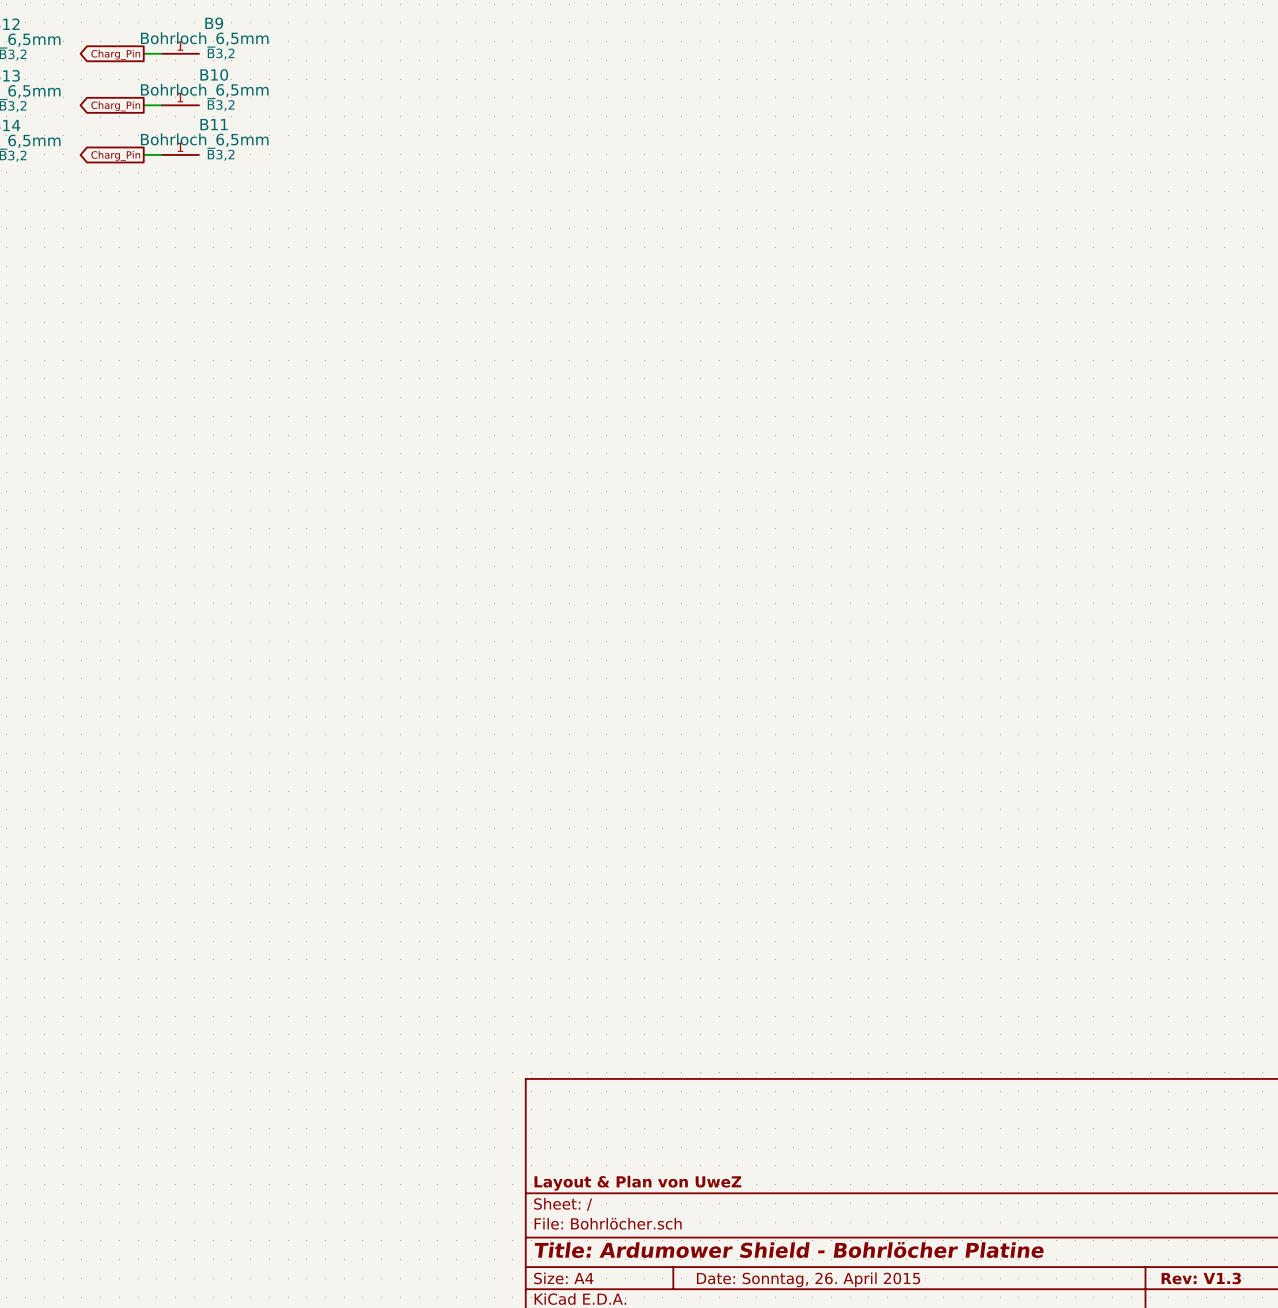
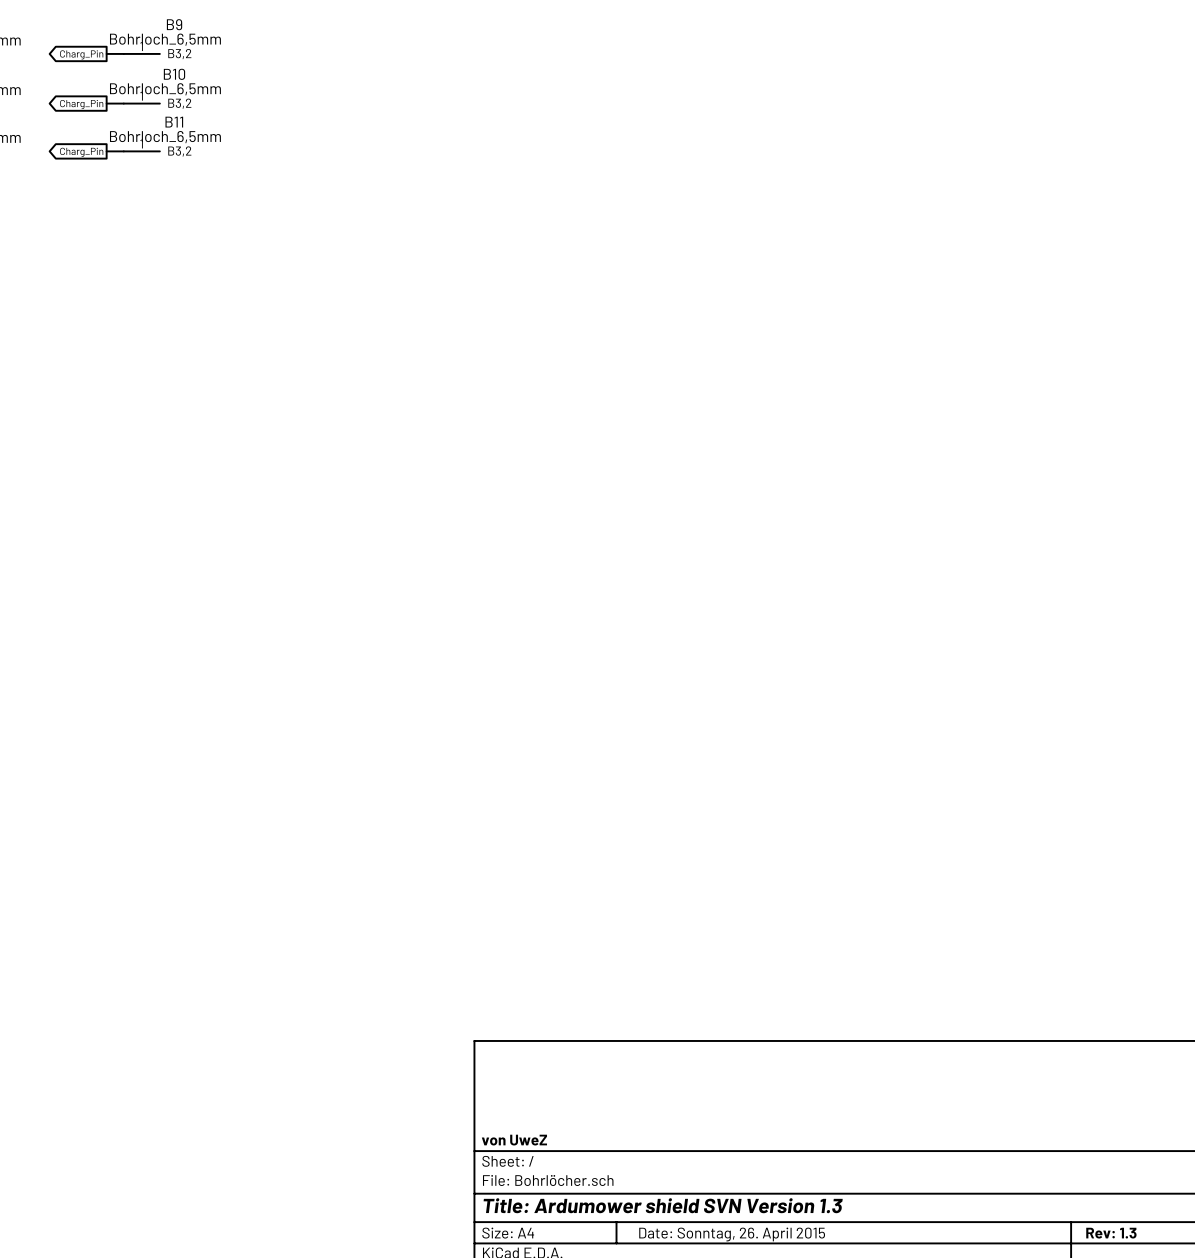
title block: Layout & Plan von UweZ (637, 1183) -> von UweZ (514, 1140)
title block: Title: Ardumower Shield - Bohrlöcher Platine (789, 1249) -> Title: Ardumower shield SVN Version 1.3 (663, 1205)
title block: Rev: V1.3 (1201, 1278) -> Rev: 1.3 (1111, 1233)

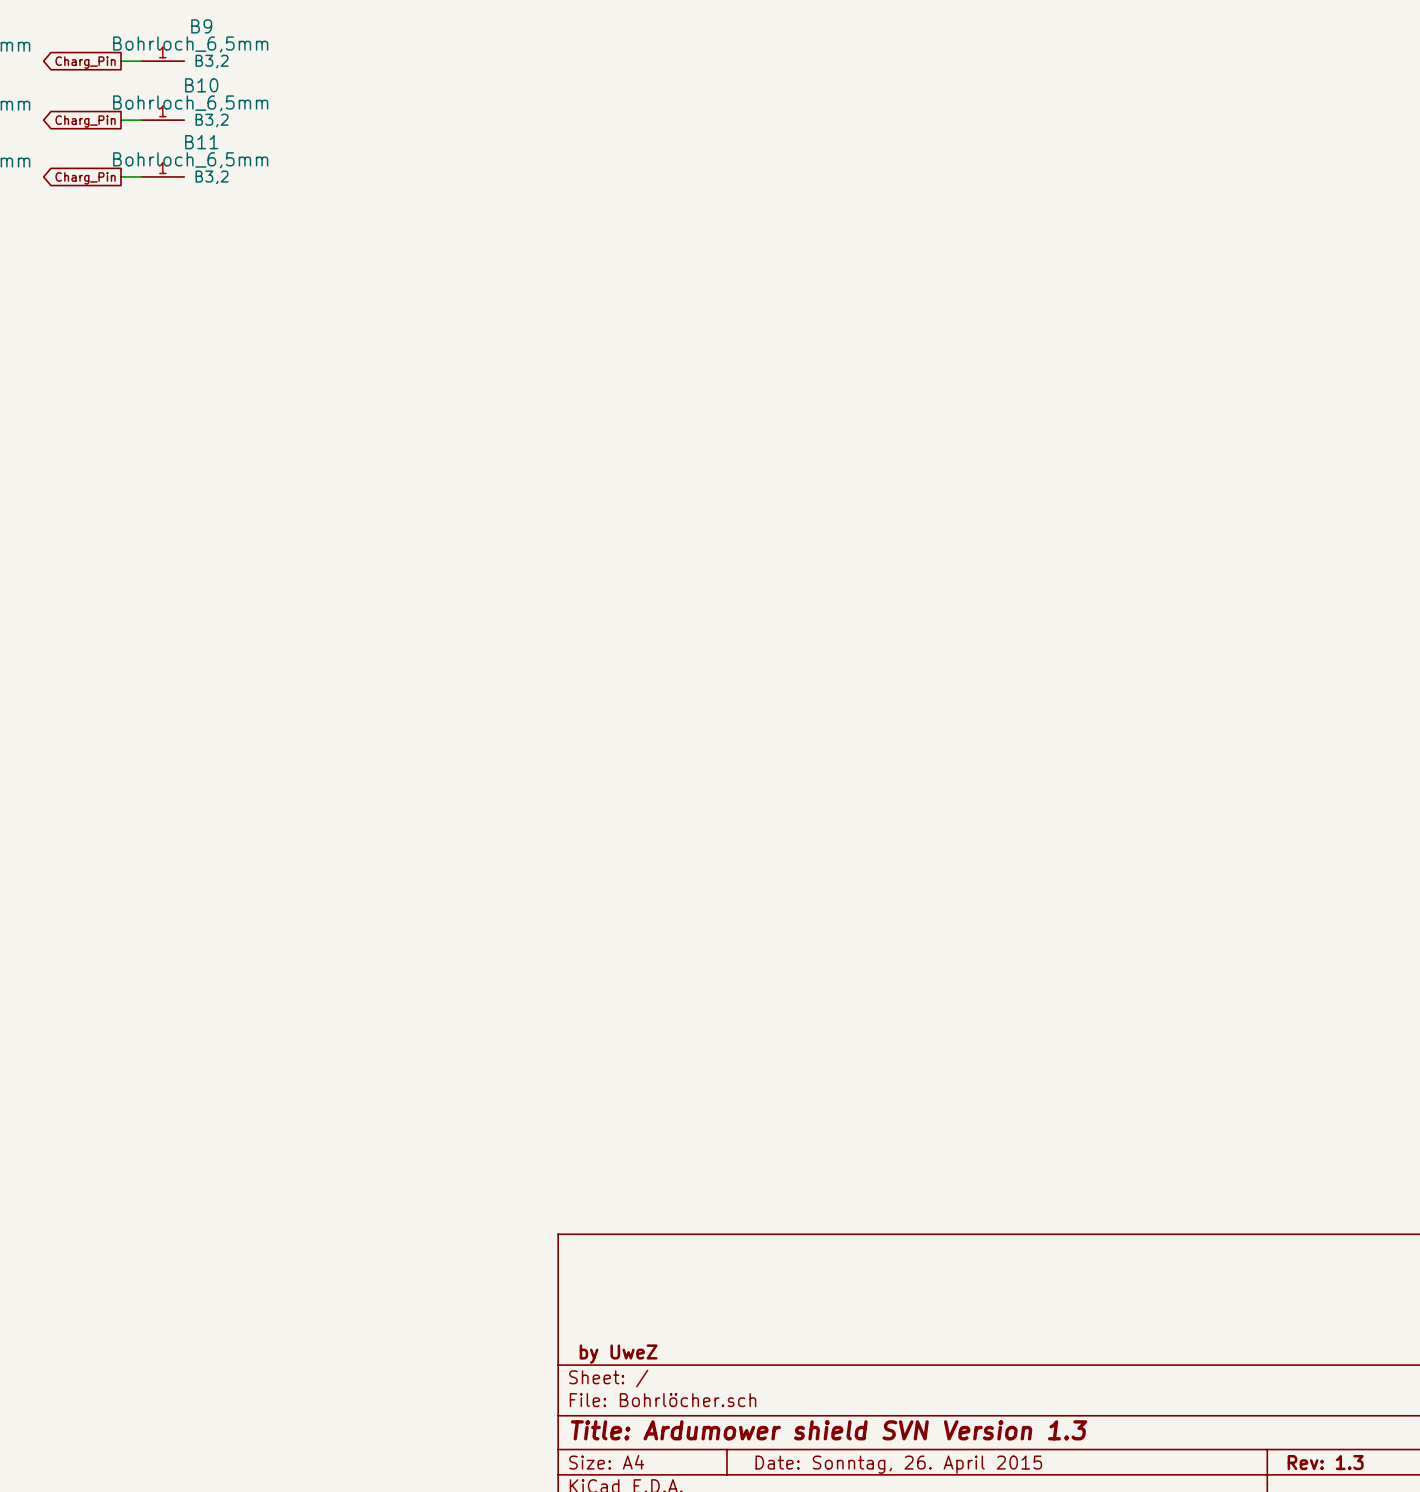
title block: von UweZ (514, 1140) -> by UweZ (618, 1354)

